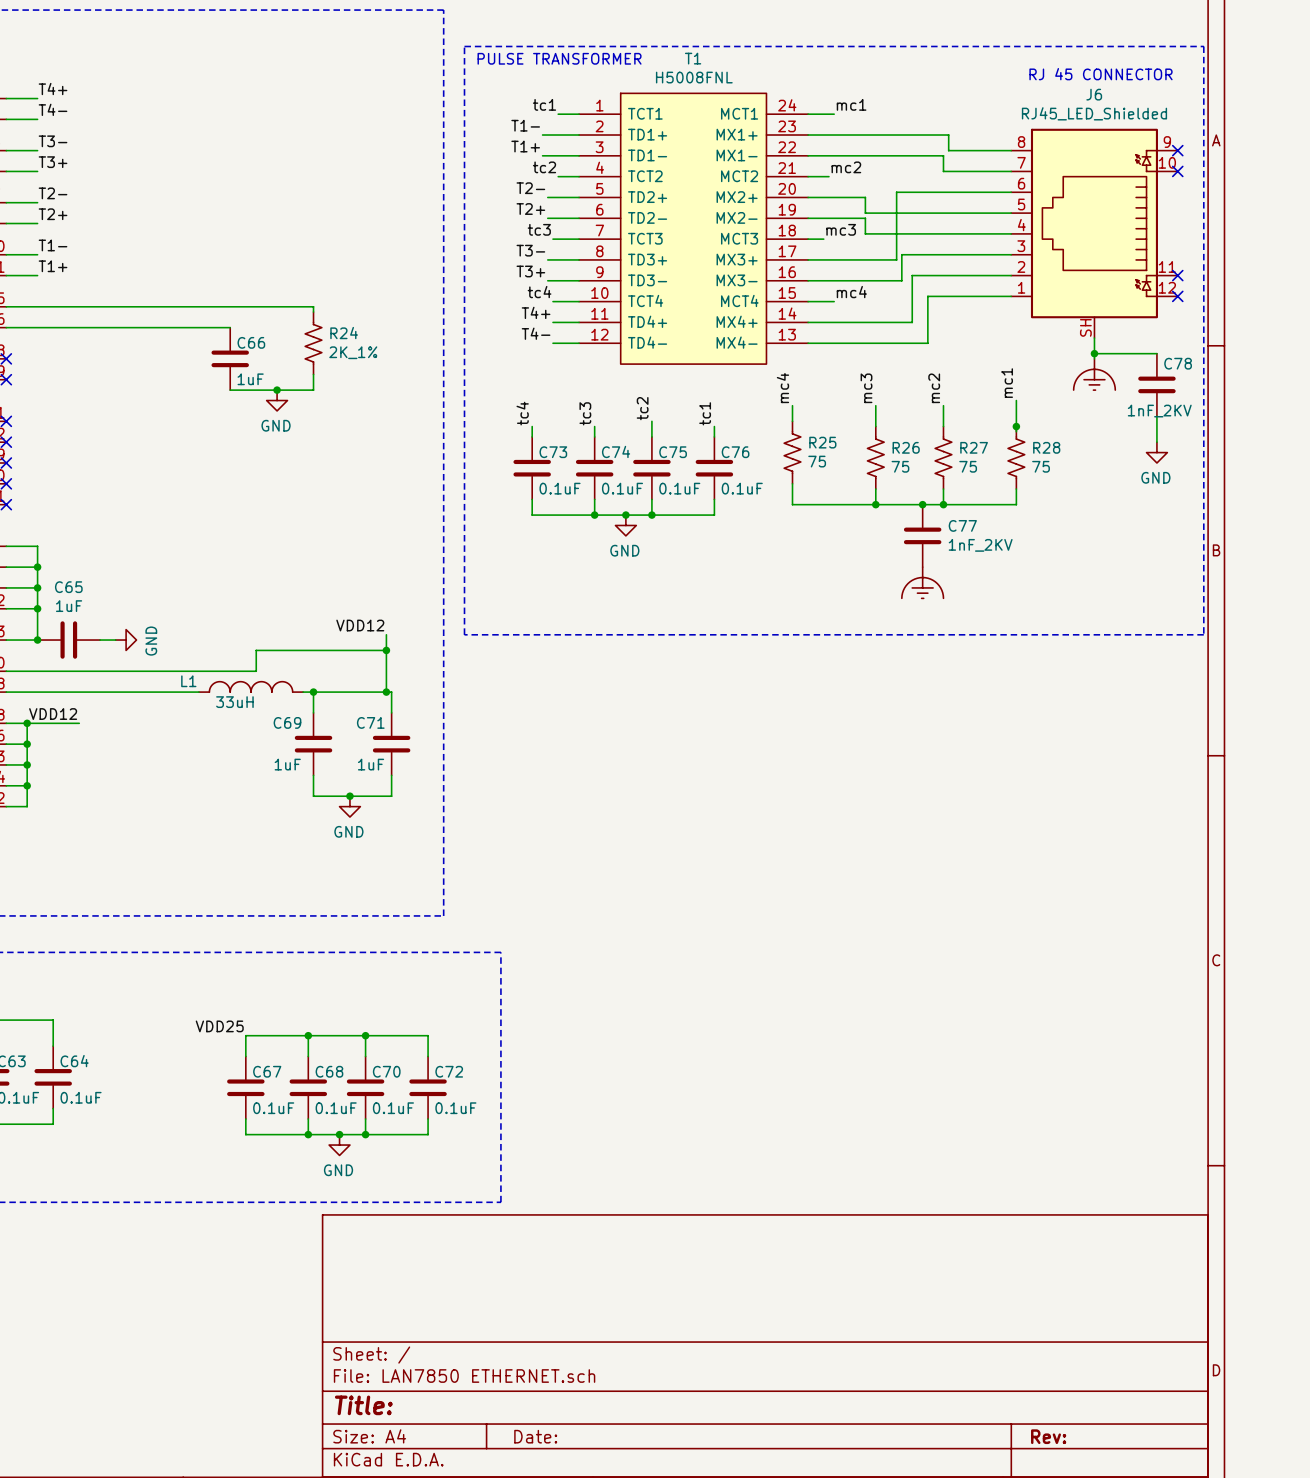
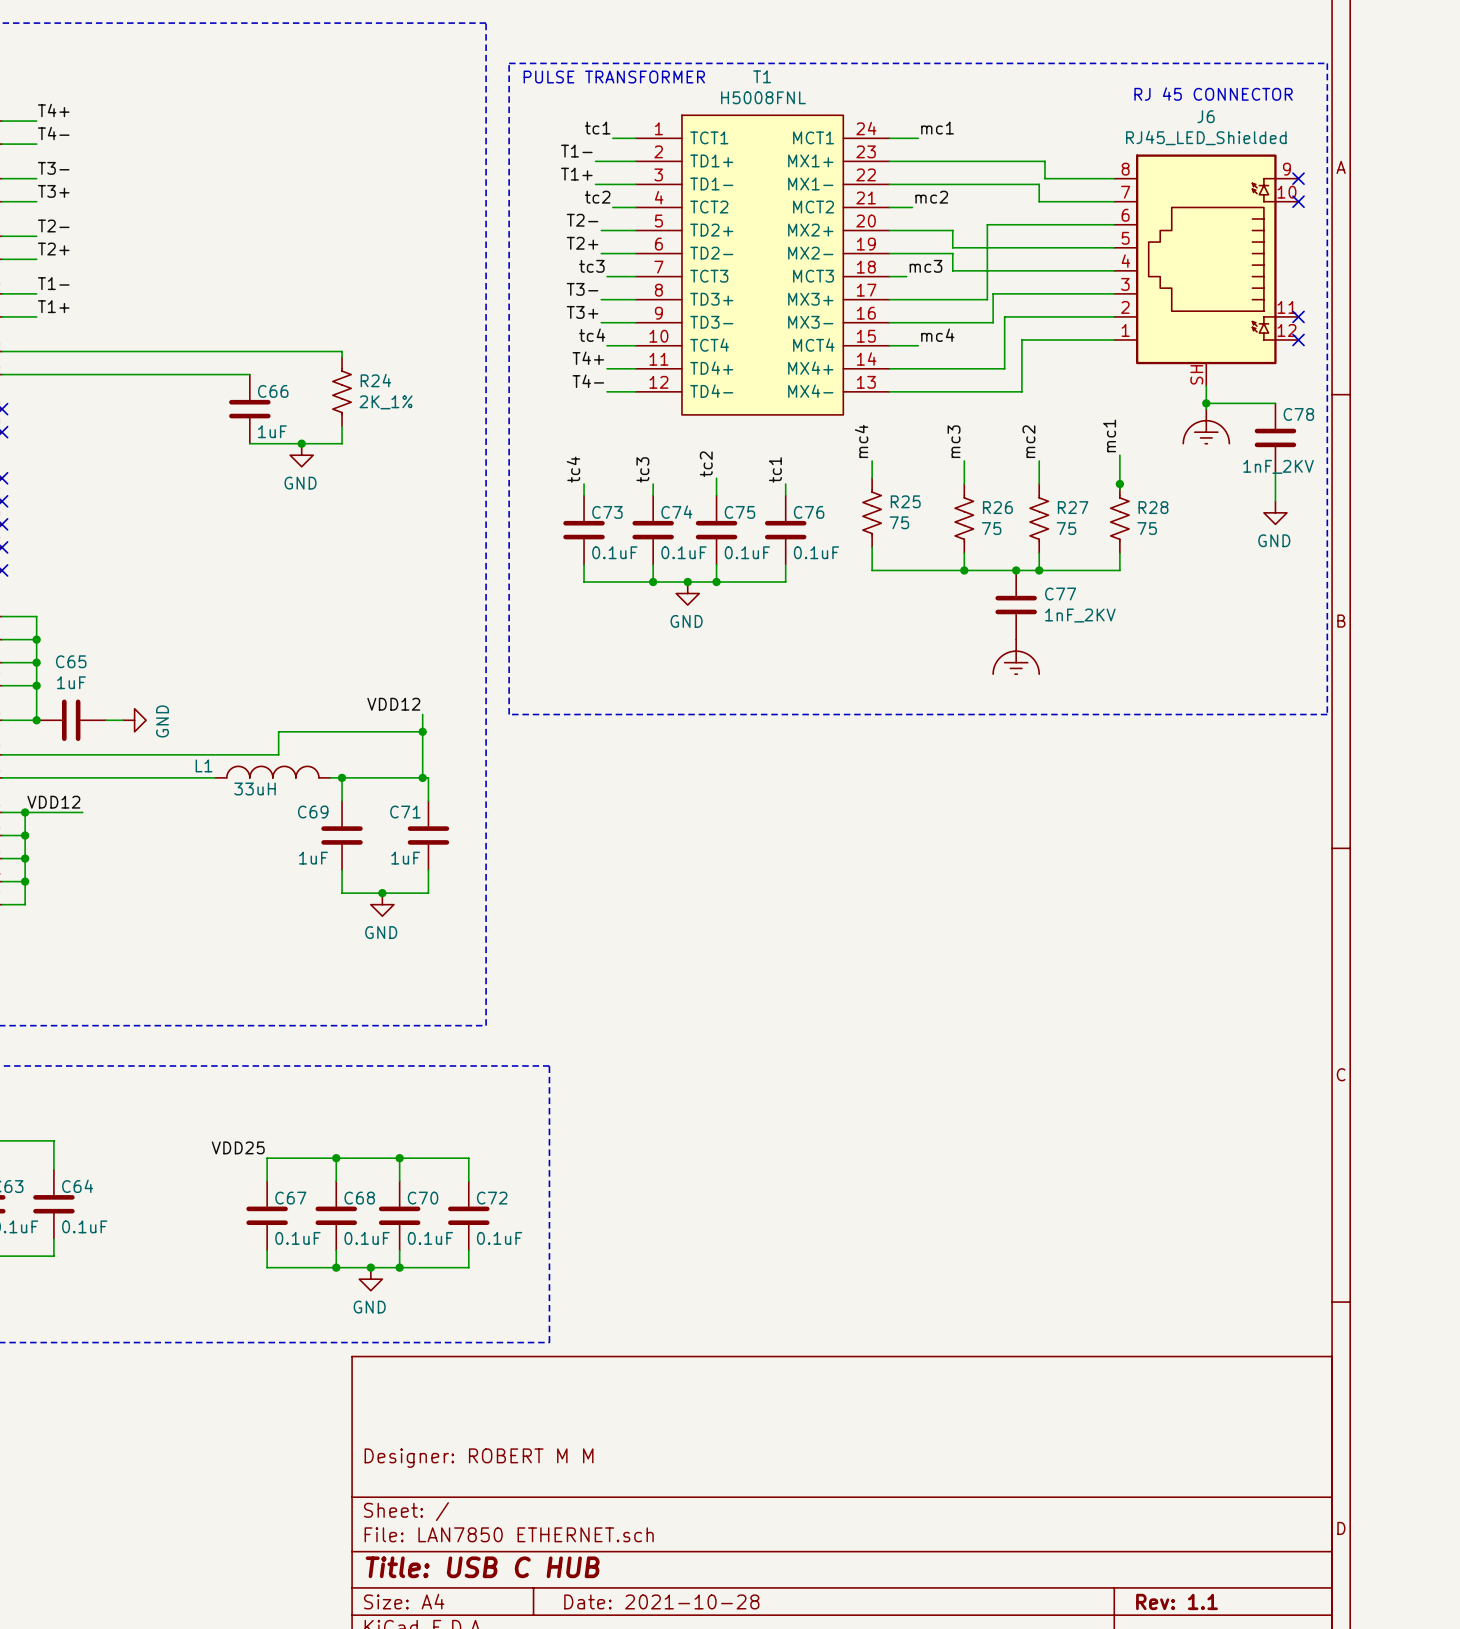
title block: none -> Designer: ROBERT M M (479, 1458)
title block: Title: (363, 1405) -> Title: USB C HUB (482, 1567)
title block: Date: (535, 1436) -> Date: 2021-10-28 (661, 1601)
title block: Rev: (1048, 1436) -> Rev: 1.1 (1176, 1601)

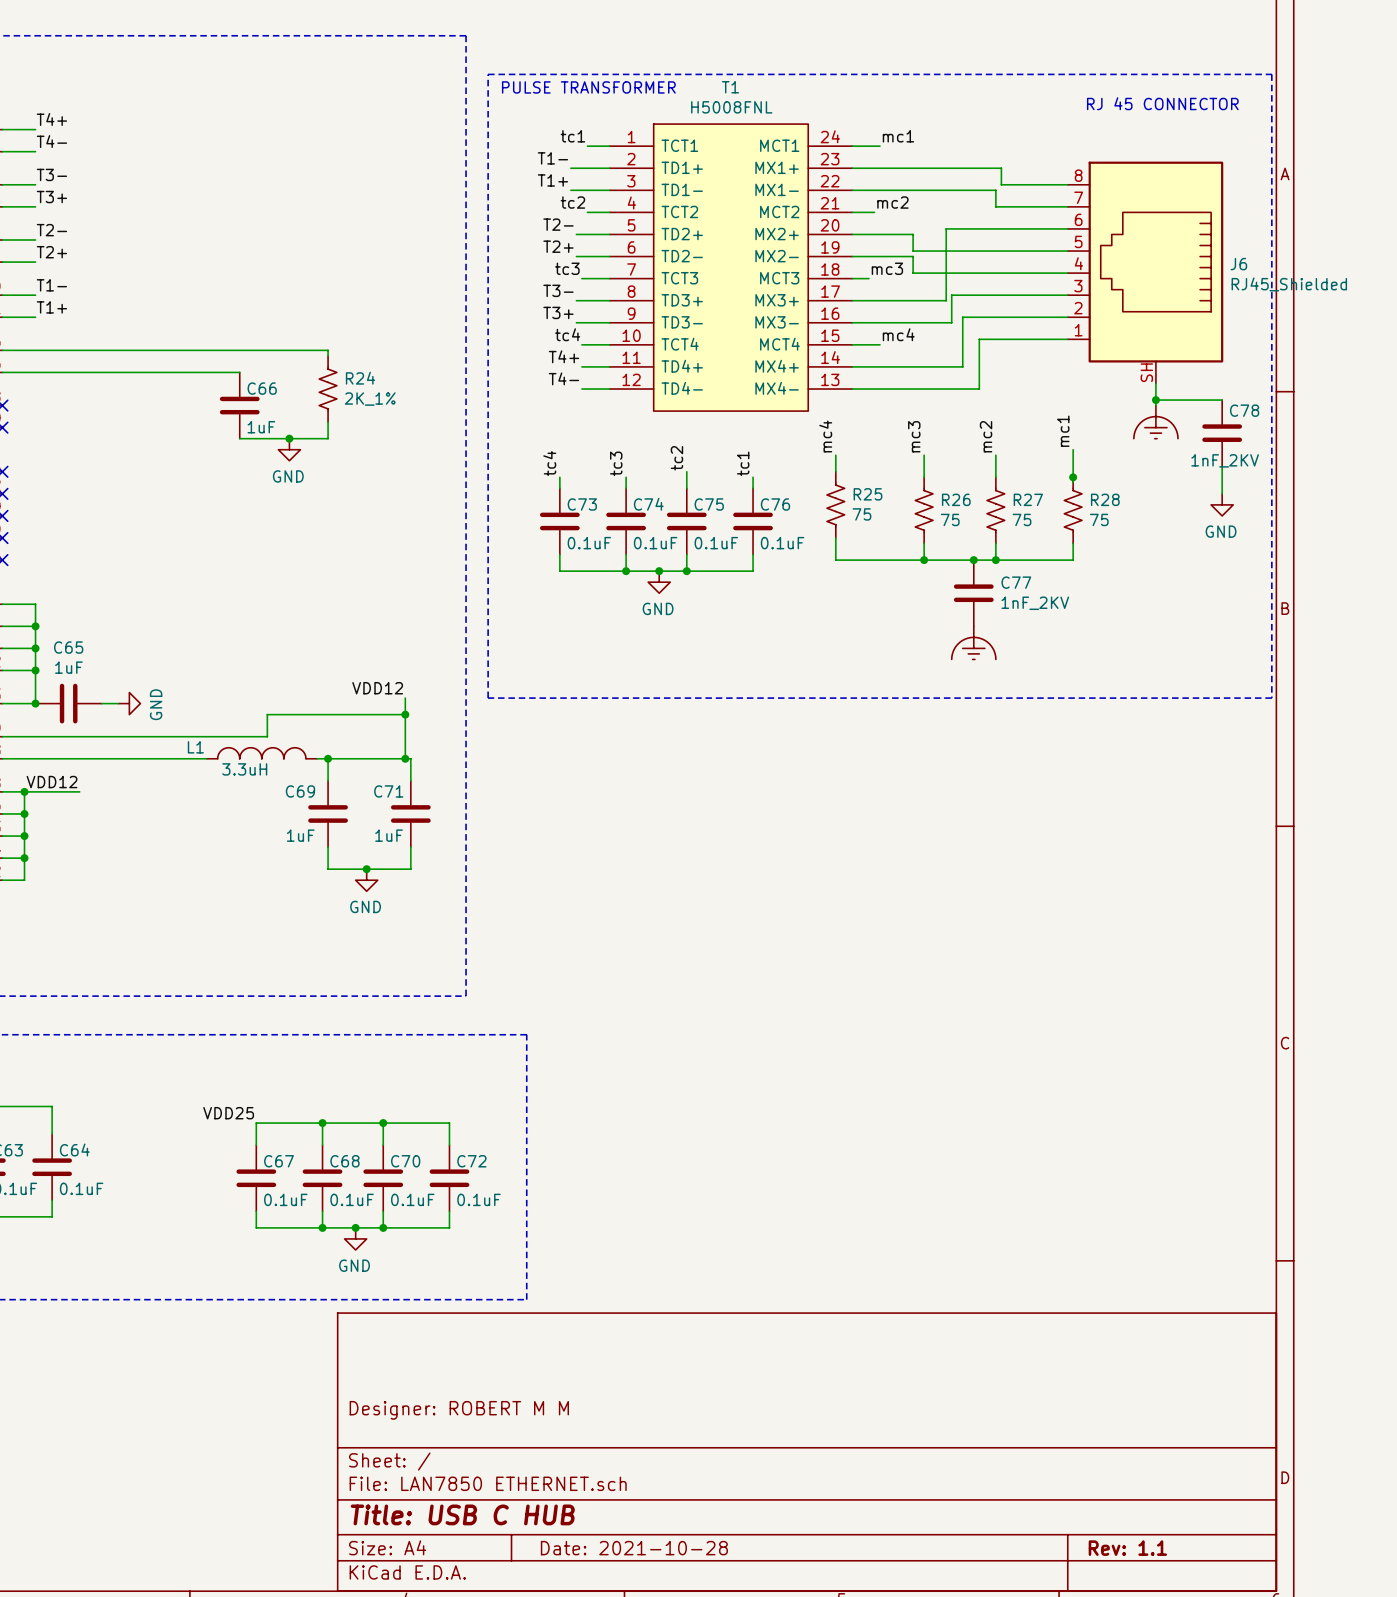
J6 name position: J6 (1206, 116) -> J6 (1238, 264)
J6 value: RJ45_LED_Shielded (1206, 137) -> RJ45_Shielded (1289, 284)
J6 symbol: [1114, 154, 1299, 387] -> [1067, 161, 1224, 384]
no-connect mark: (1298, 178) -> none
no-connect mark: (1298, 201) -> none
no-connect mark: (1298, 316) -> none
no-connect mark: (1298, 339) -> none
L1 value: 33uH (255, 788) -> 3.3uH (244, 769)

